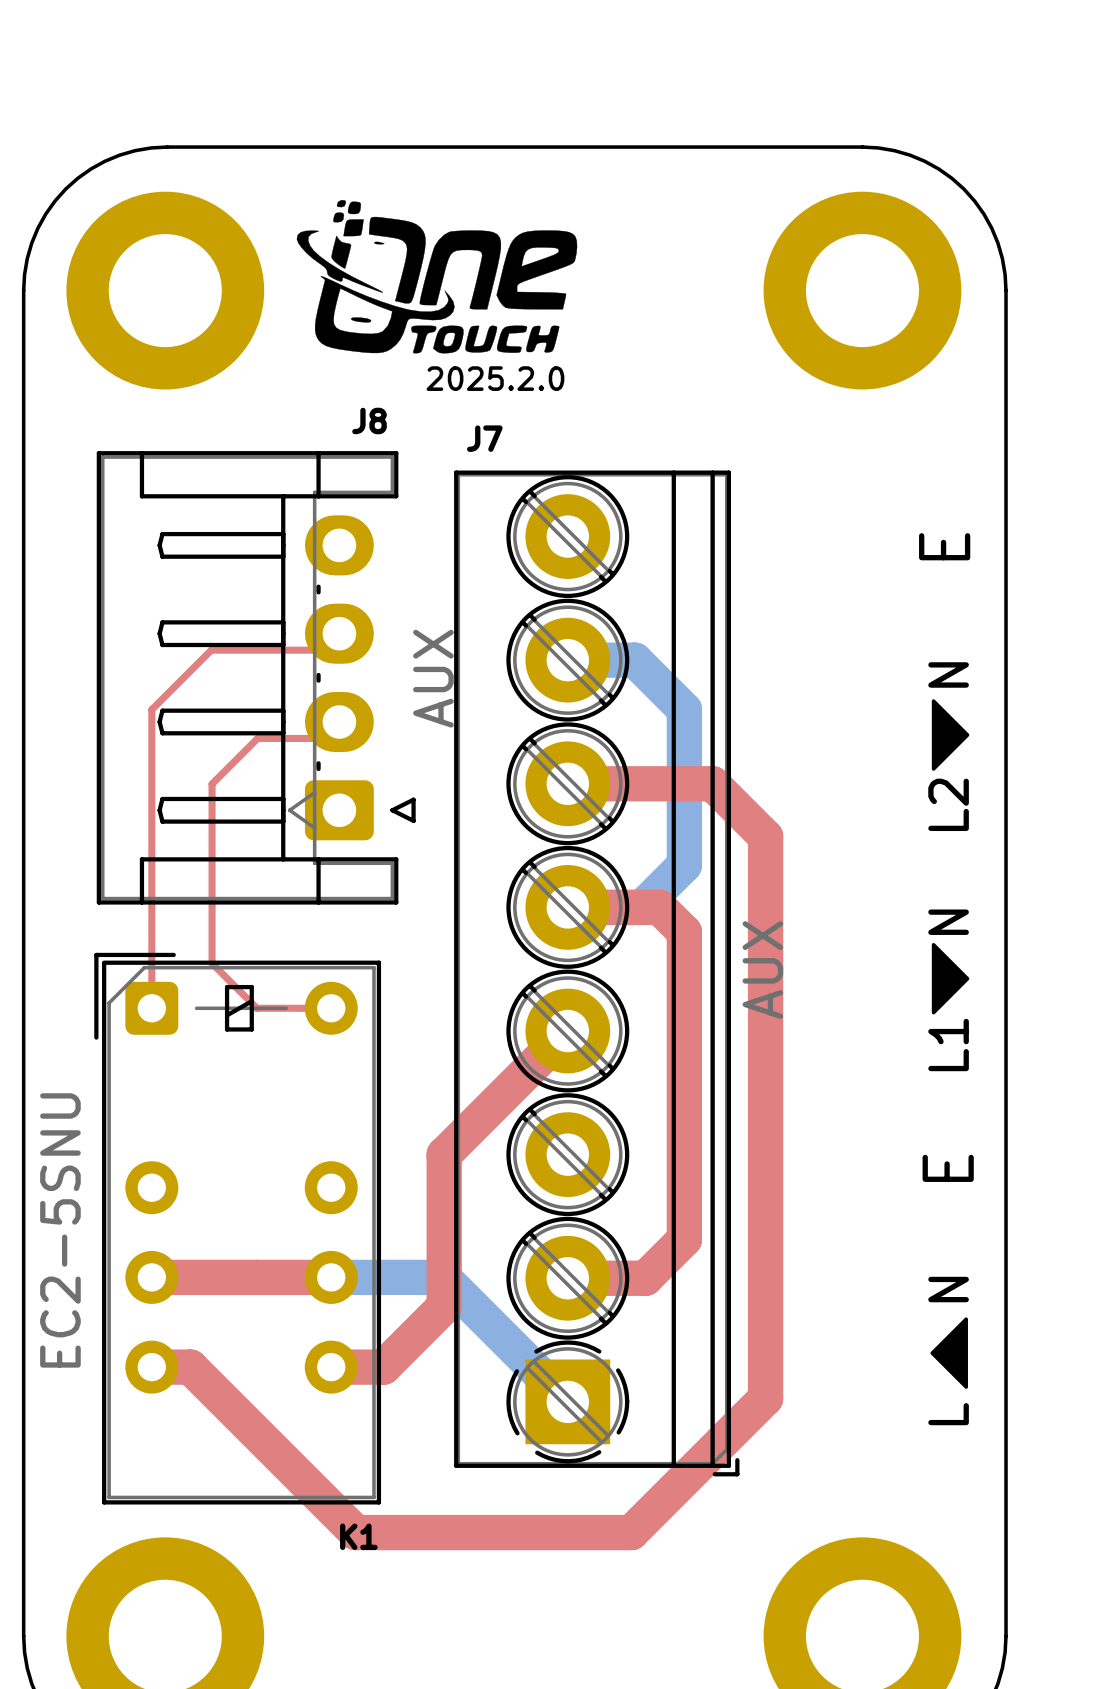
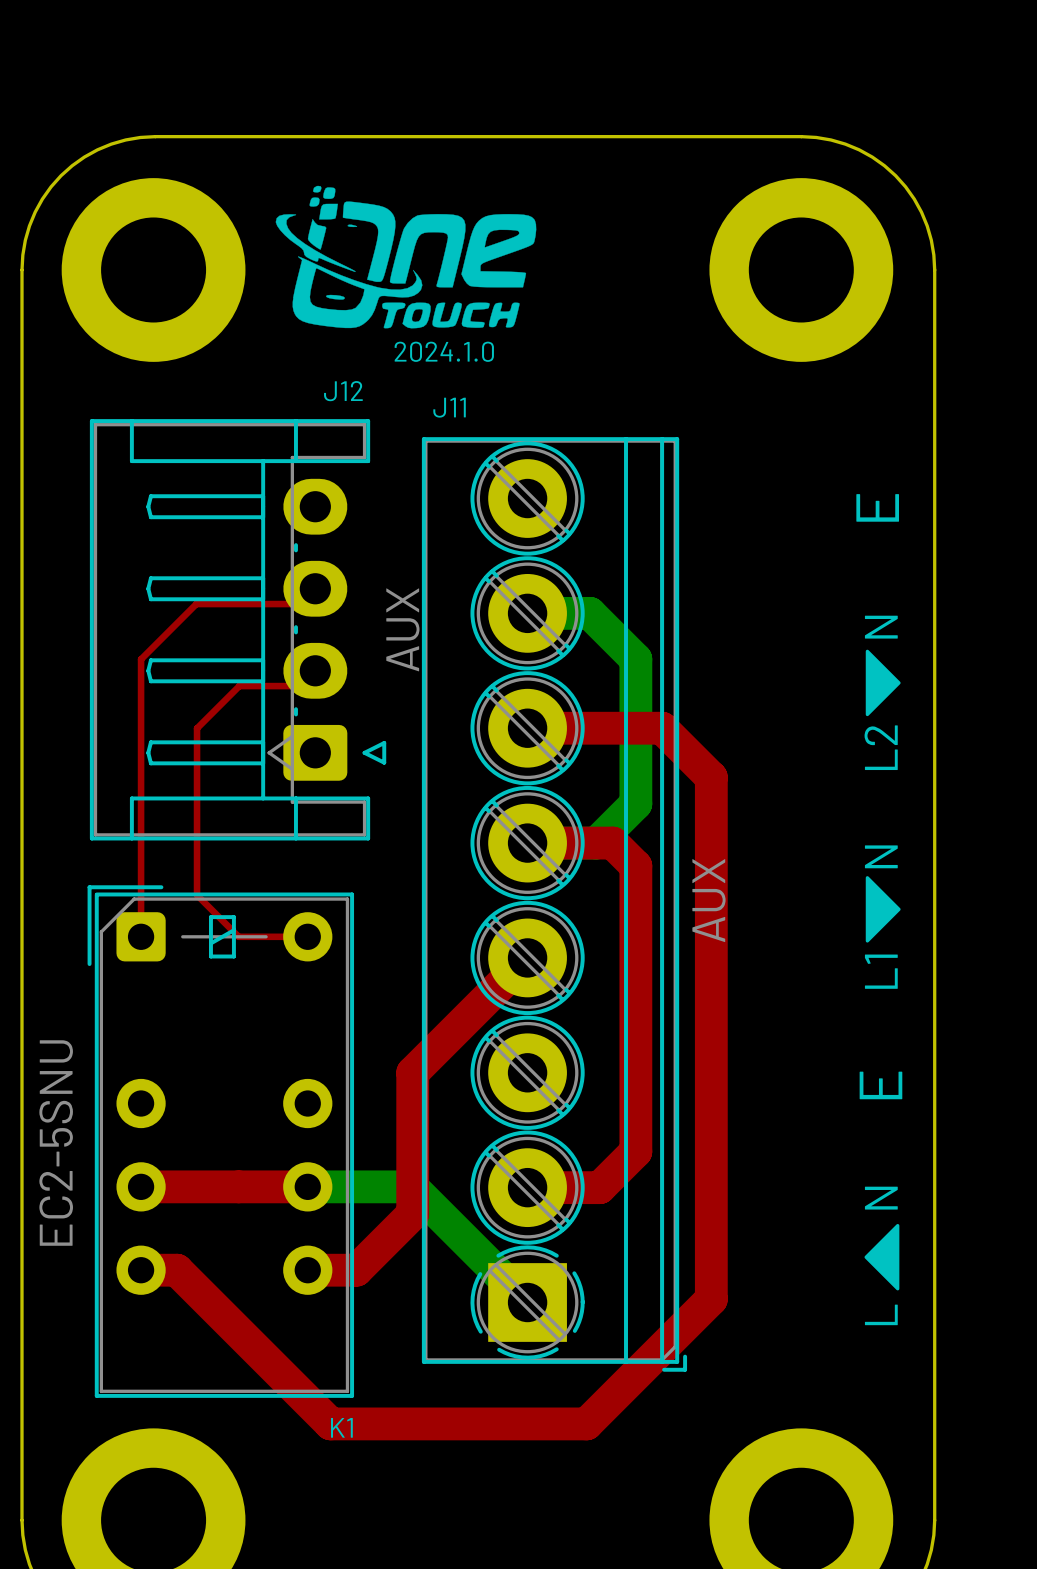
text: 2025.2.0 (495, 378) -> 2024.1.0 (444, 351)
J8 name: J8 (369, 420) -> J12 (343, 391)
J7 name: J7 (484, 438) -> J11 (449, 407)

